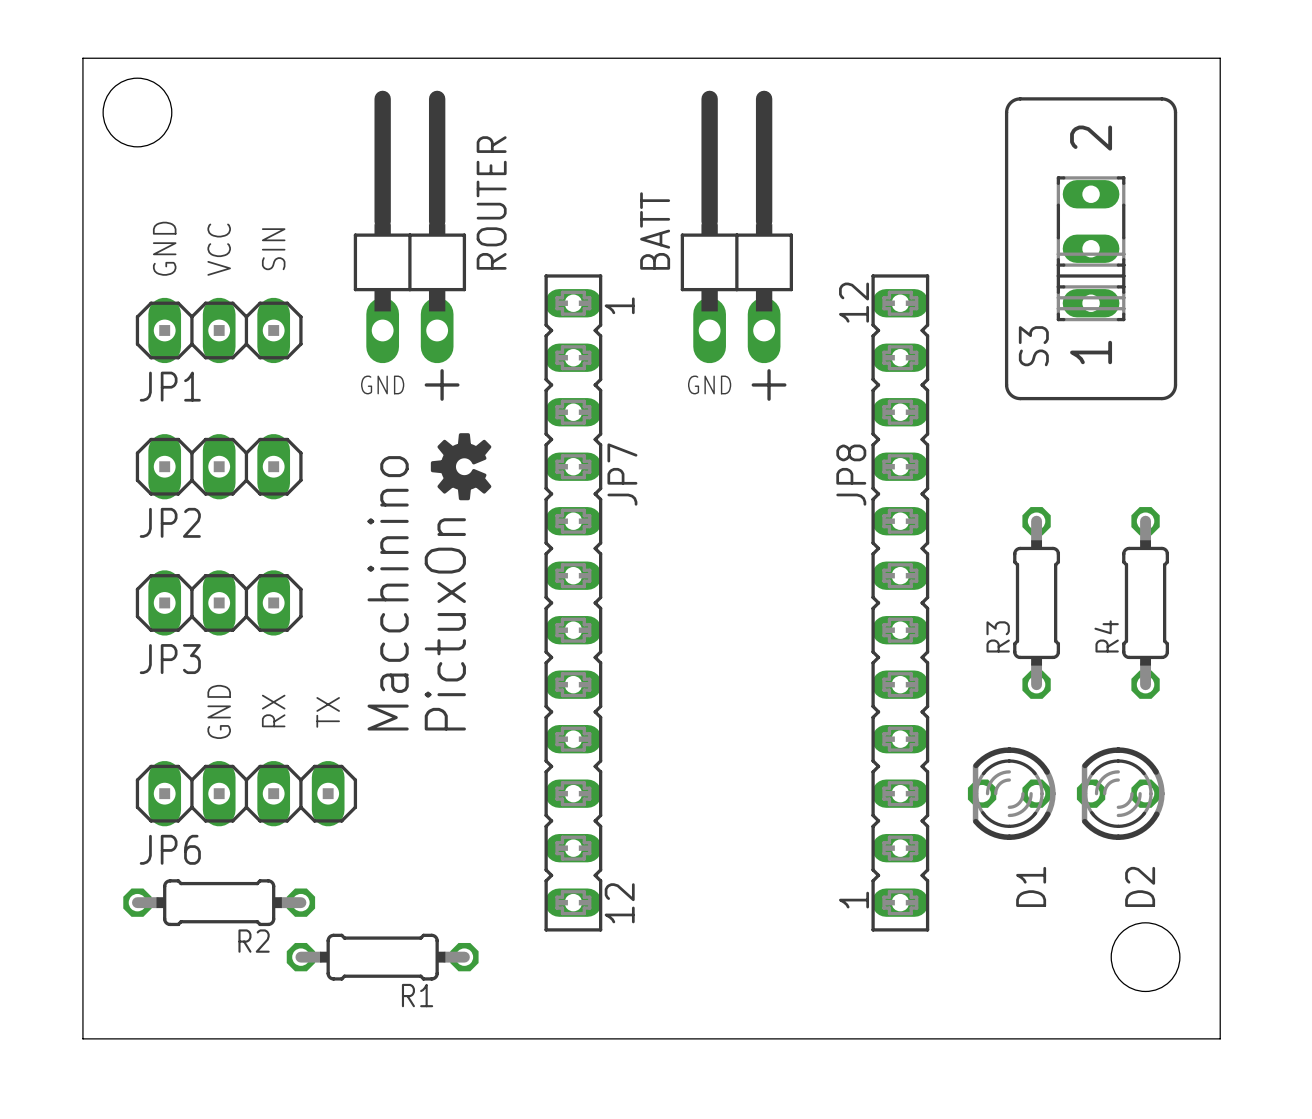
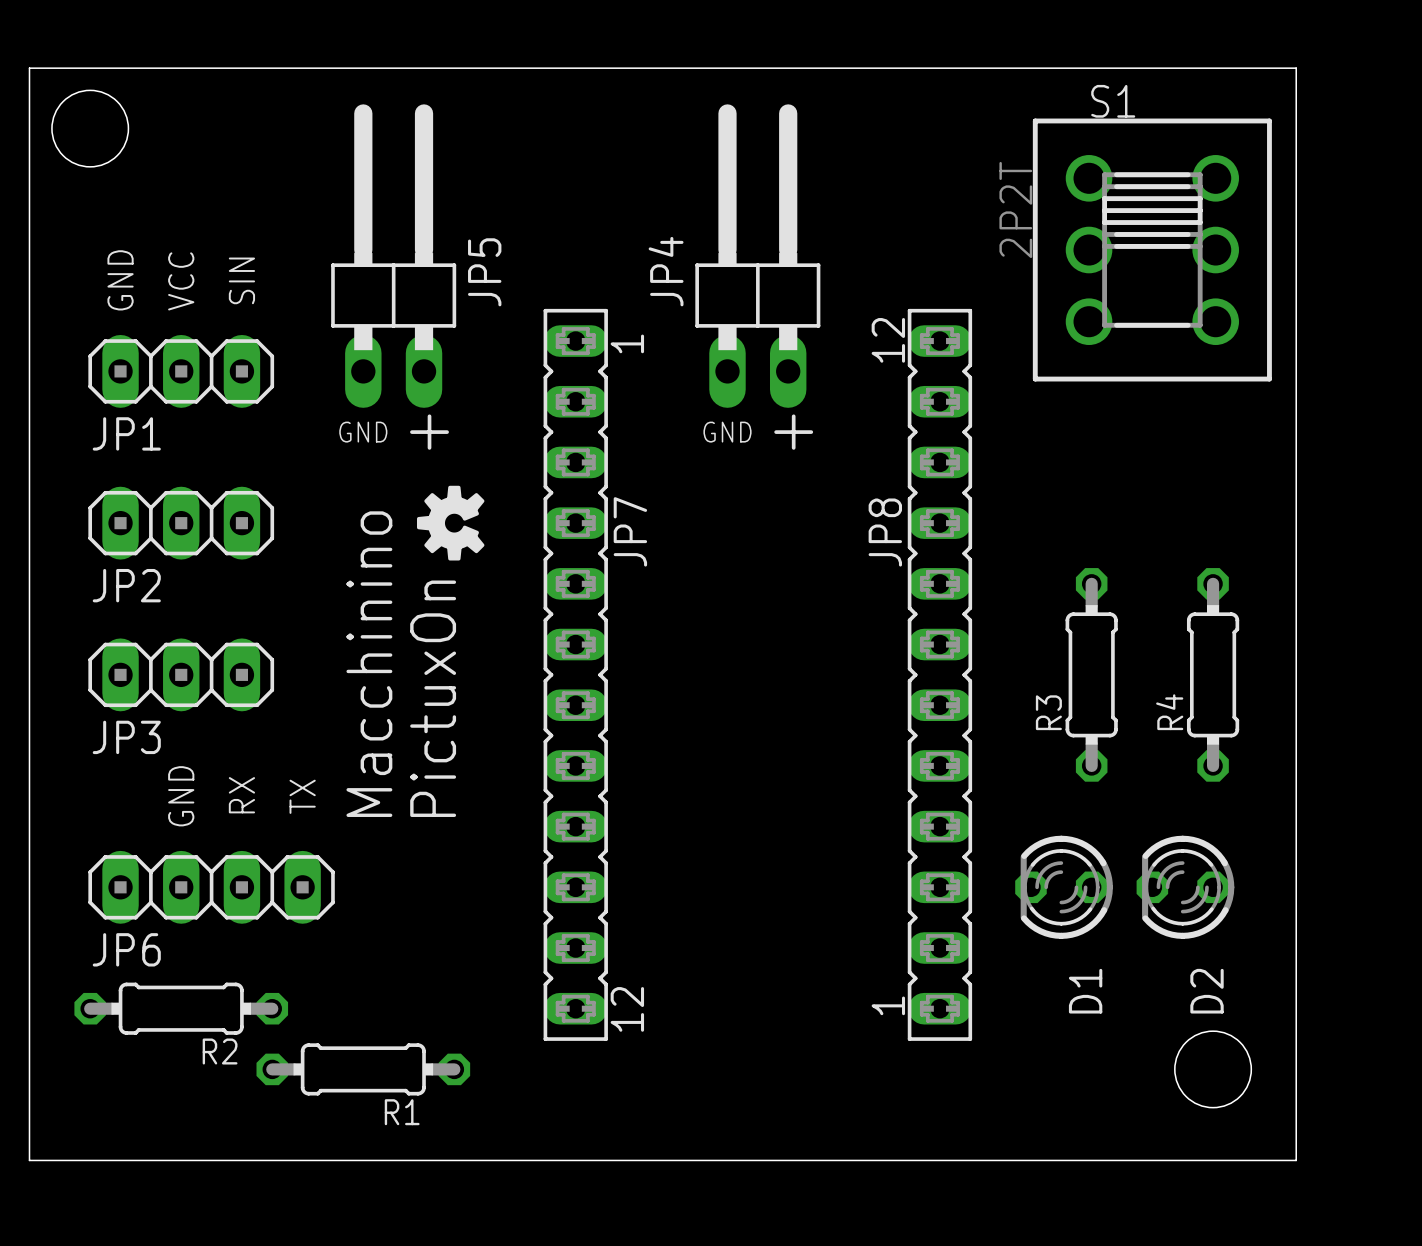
ROUTER name: ROUTER (491, 202) -> JP5 (484, 272)
S1: none -> 2P2T (1152, 250)
BATT name: BATT (655, 230) -> JP4 (666, 271)
S3: (1091, 248) -> none

